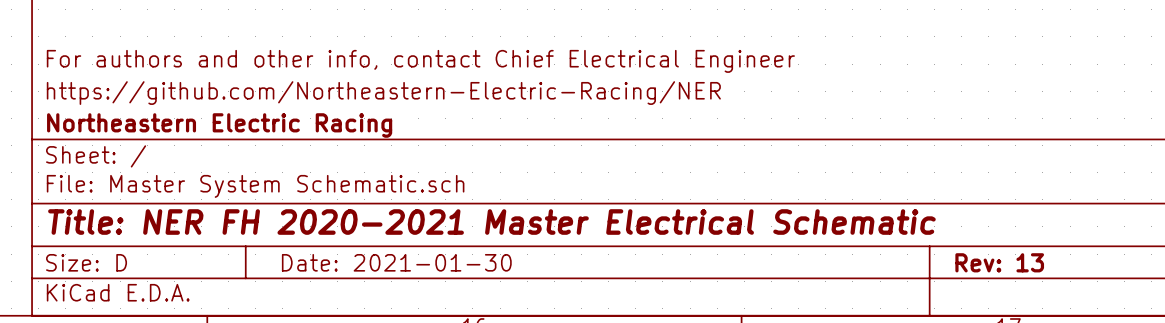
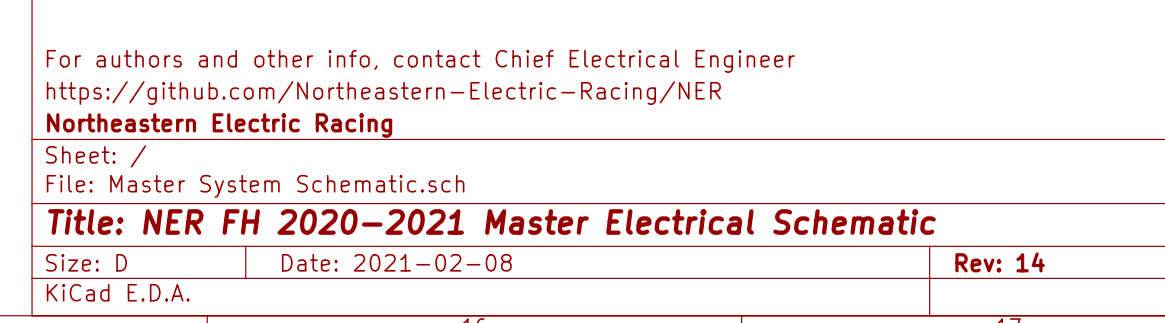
title block: Date: 2021-01-30 (396, 262) -> Date: 2021-02-08 (396, 262)
title block: Rev: 13 (999, 262) -> Rev: 14 (1000, 262)

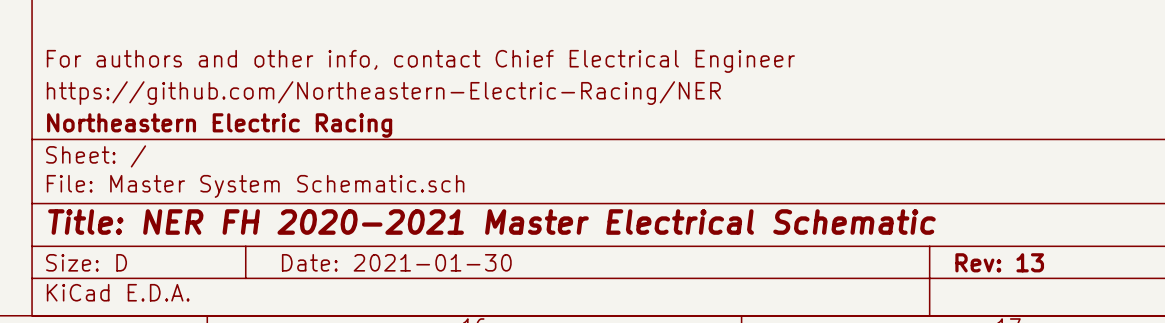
title block: Date: 2021-02-08 (396, 262) -> Date: 2021-01-30 (396, 262)
title block: Rev: 14 (1000, 262) -> Rev: 13 (999, 262)

